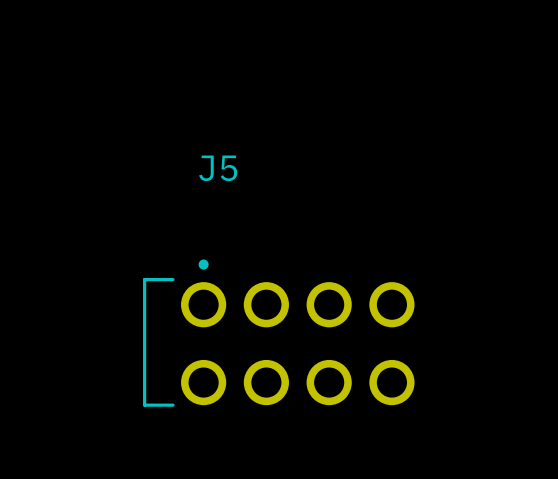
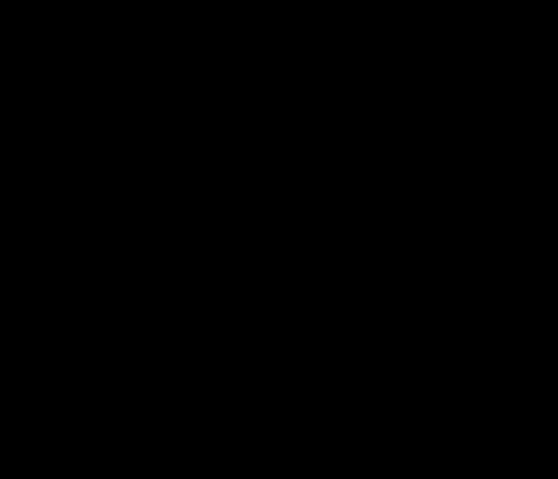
J5: (278, 333) -> none

